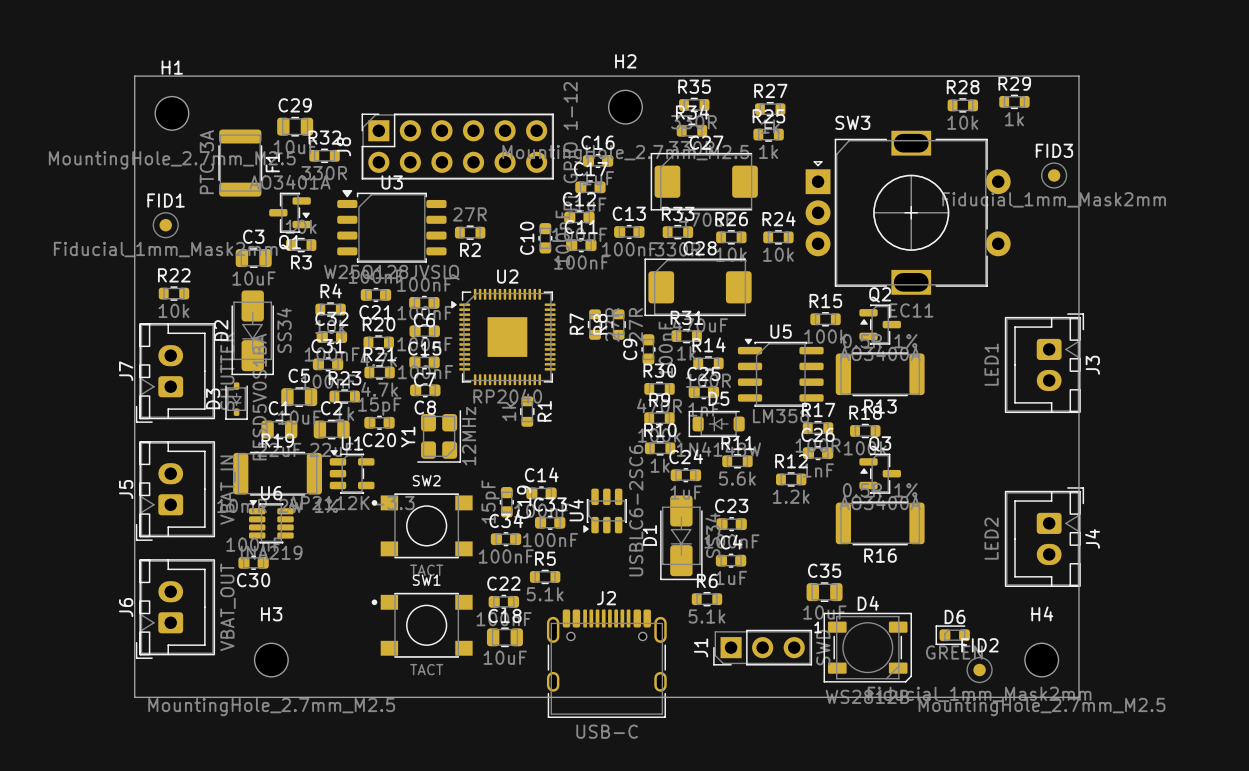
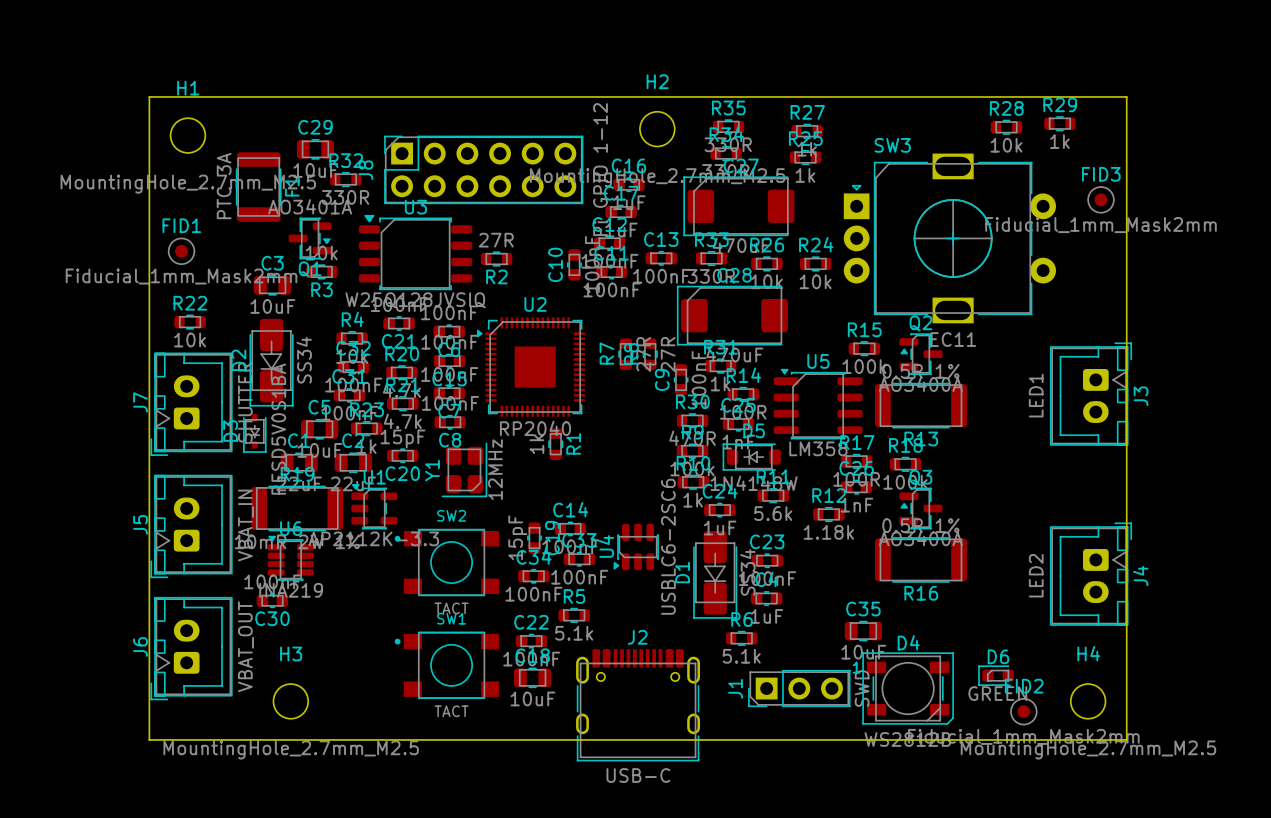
R12 value: 1.2k (791, 496) -> 1.18k (828, 532)

